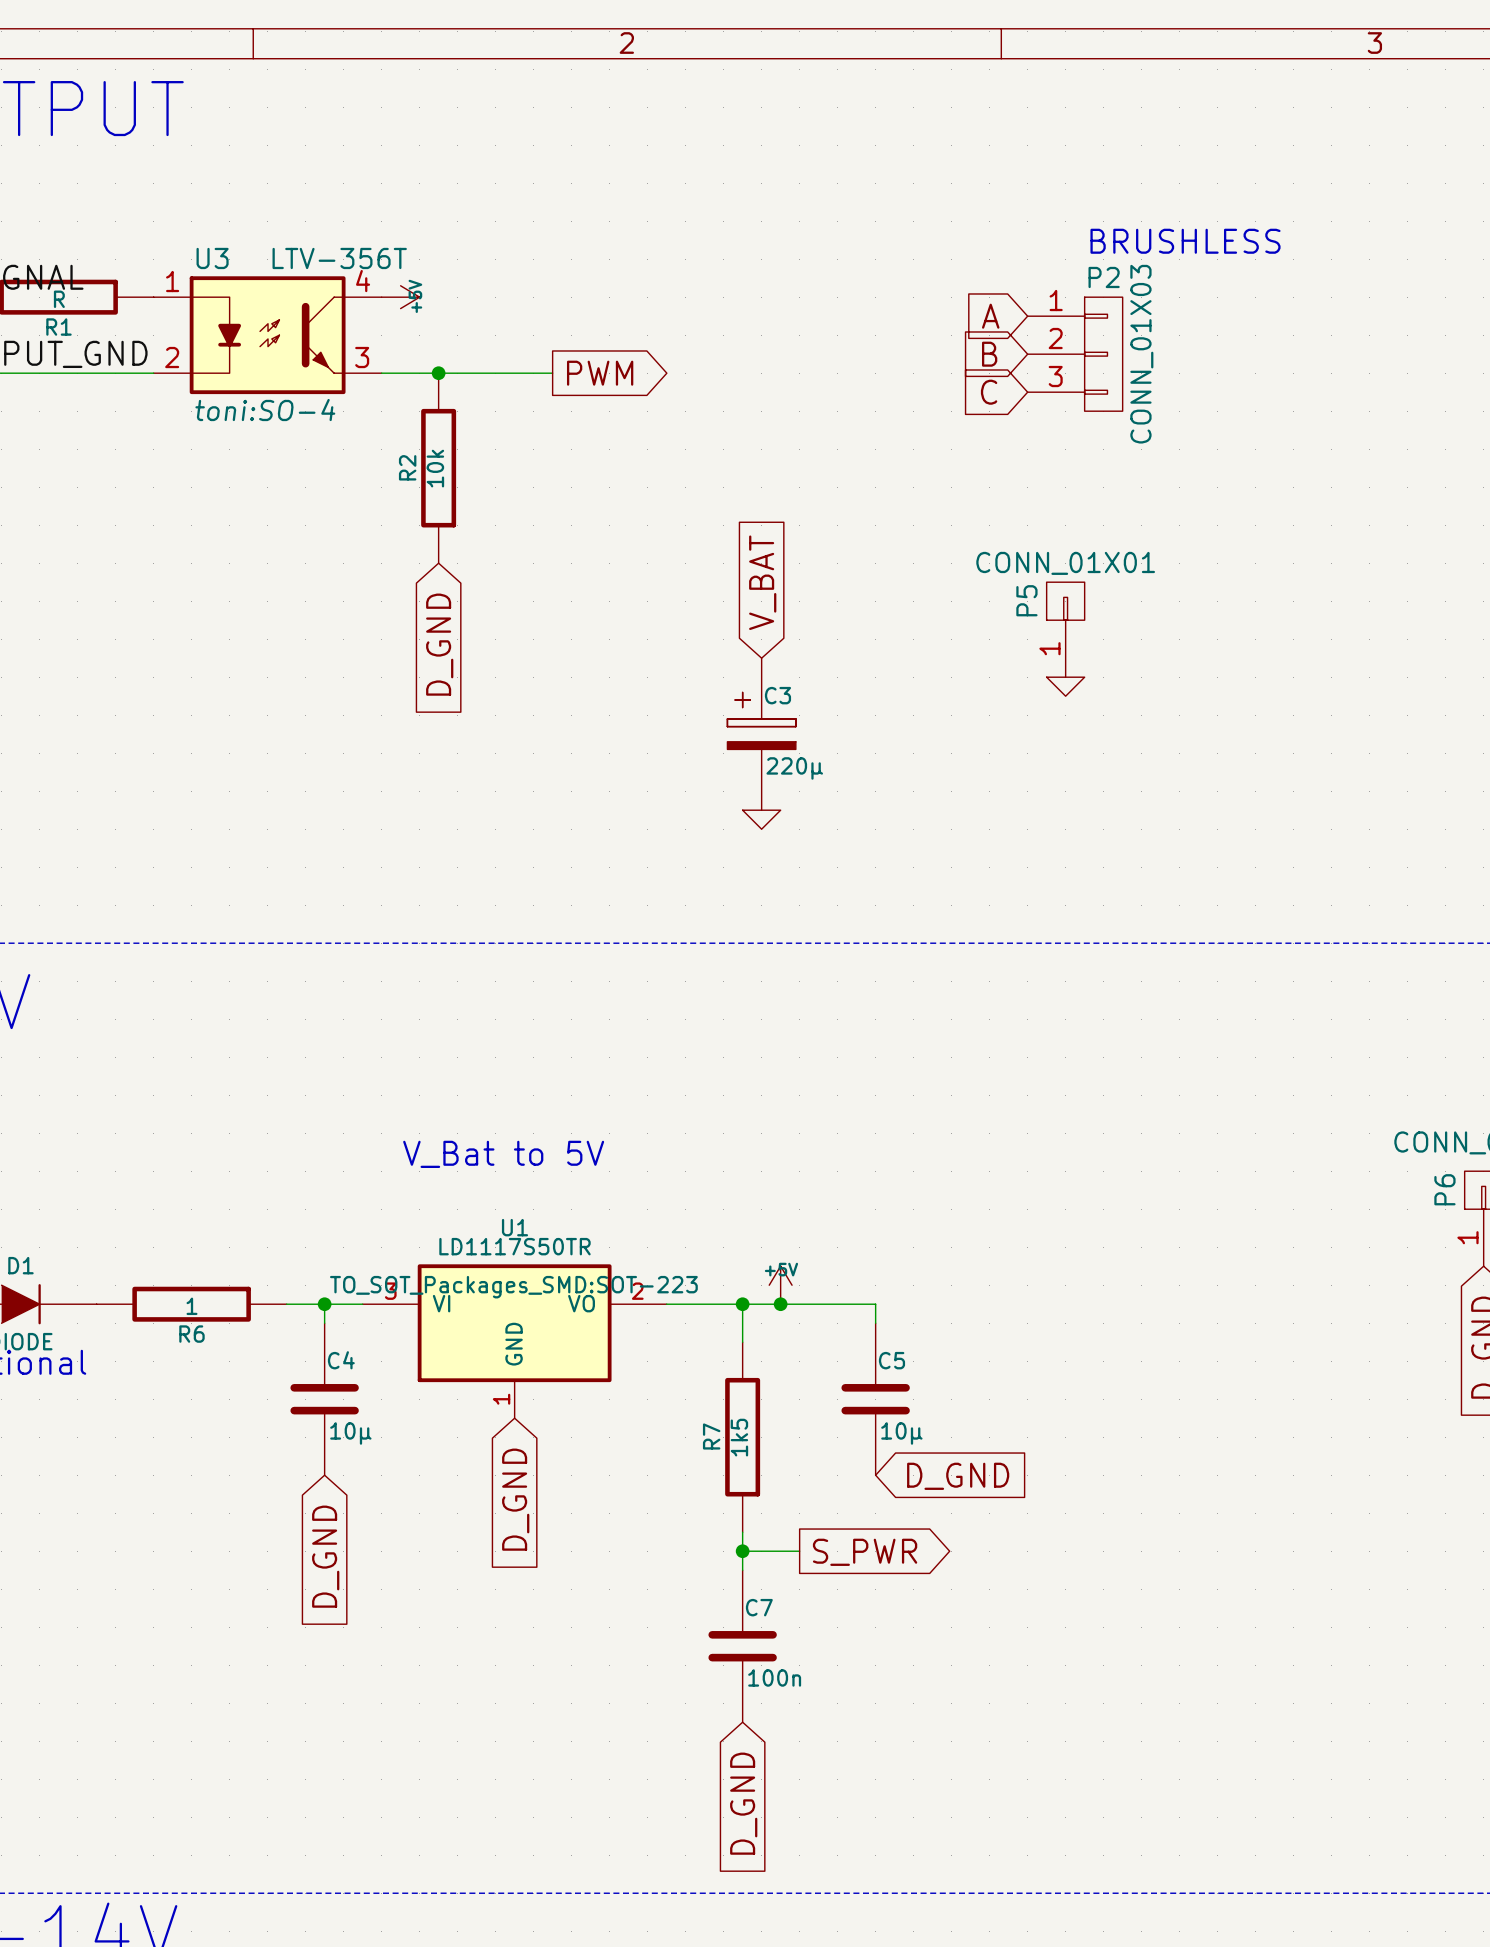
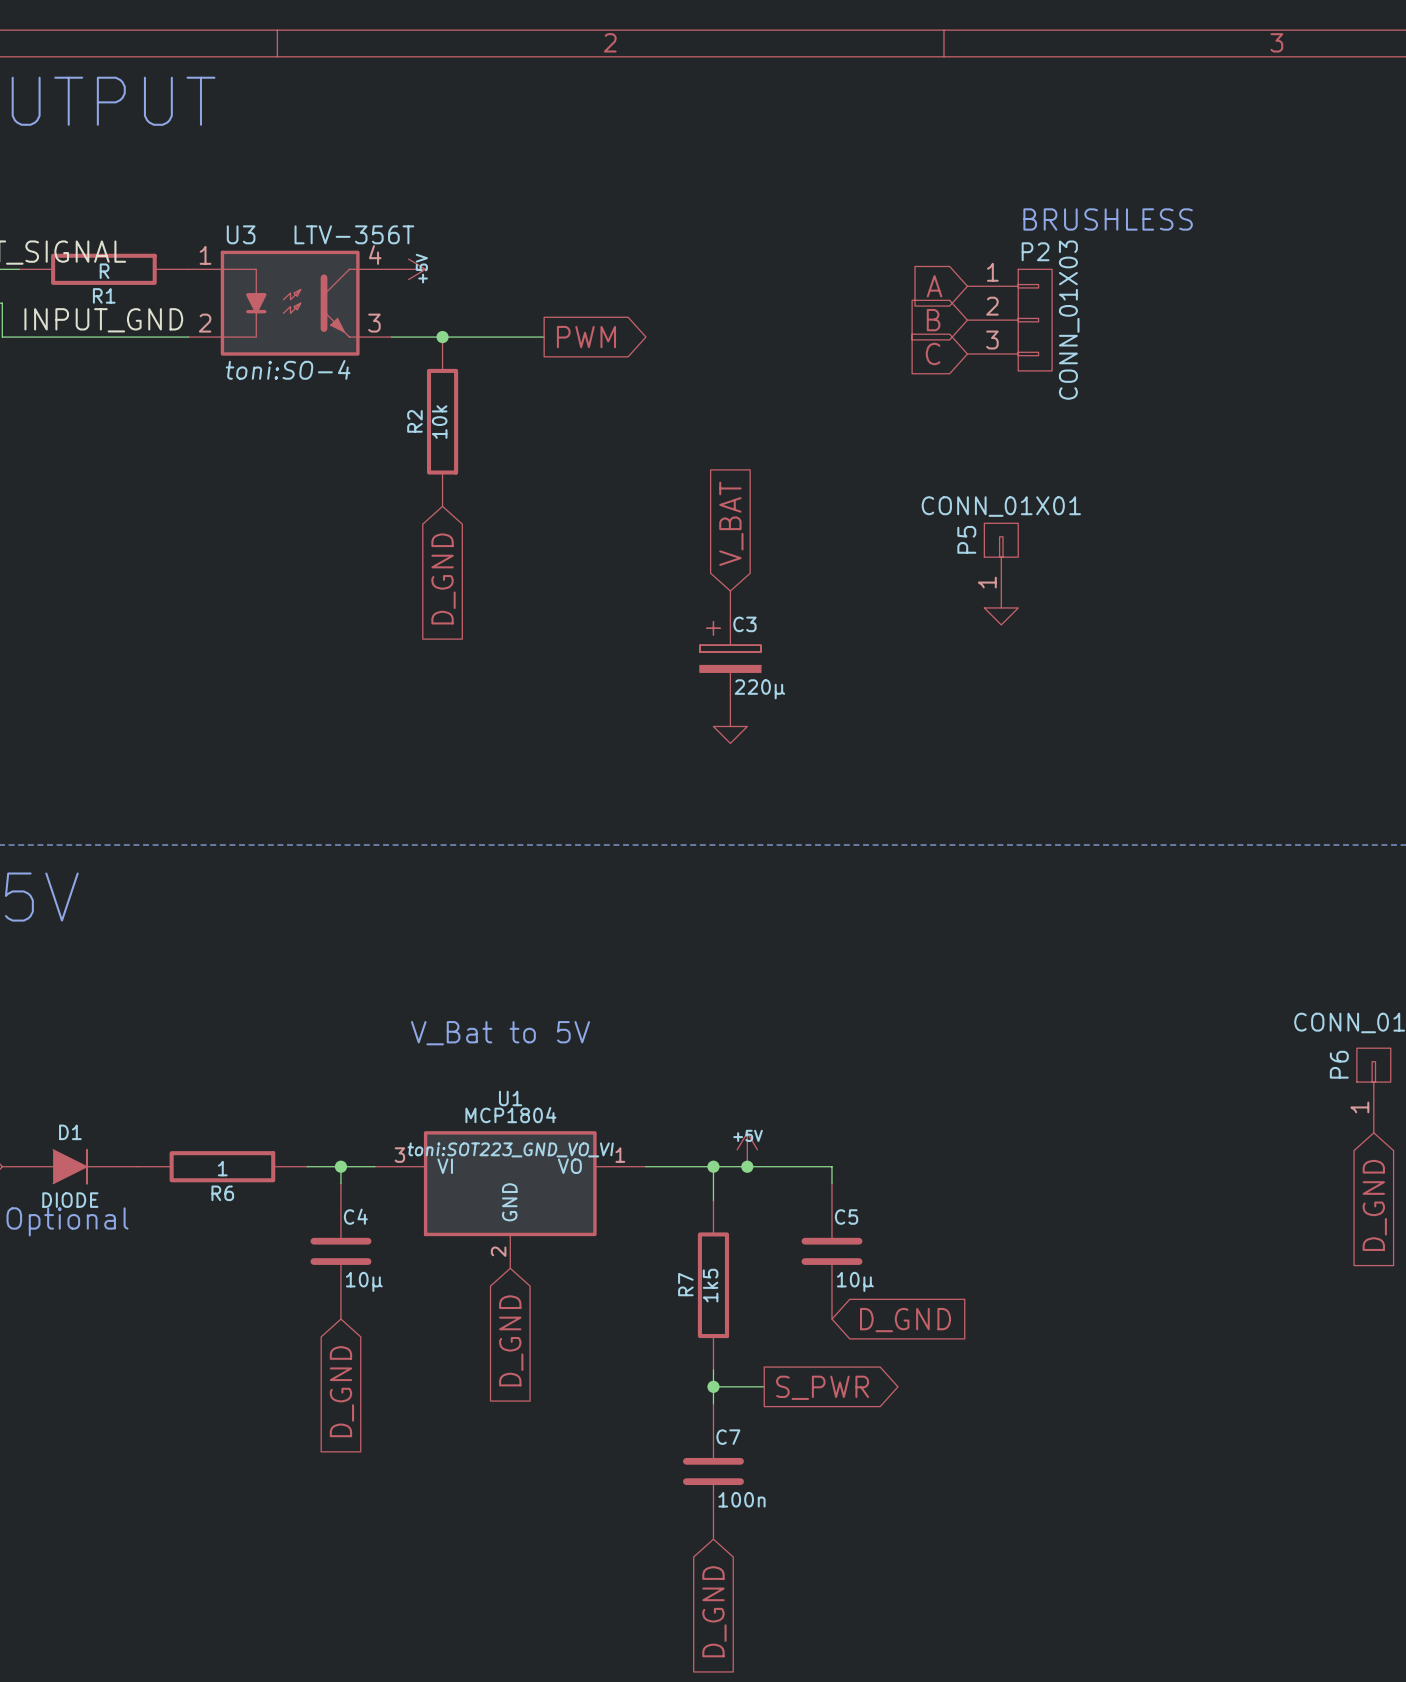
U1 value: LD1117S50TR (514, 1246) -> MCP1804 (510, 1115)
U1 text: TO_SOT_Packages_SMD:SOT-223 (513, 1287) -> toni:SOT223_GND_VO_VI (510, 1149)
U1 pin number: 2 (637, 1291) -> 1 (620, 1155)
U1 pin number: 1 (501, 1399) -> 2 (498, 1251)

